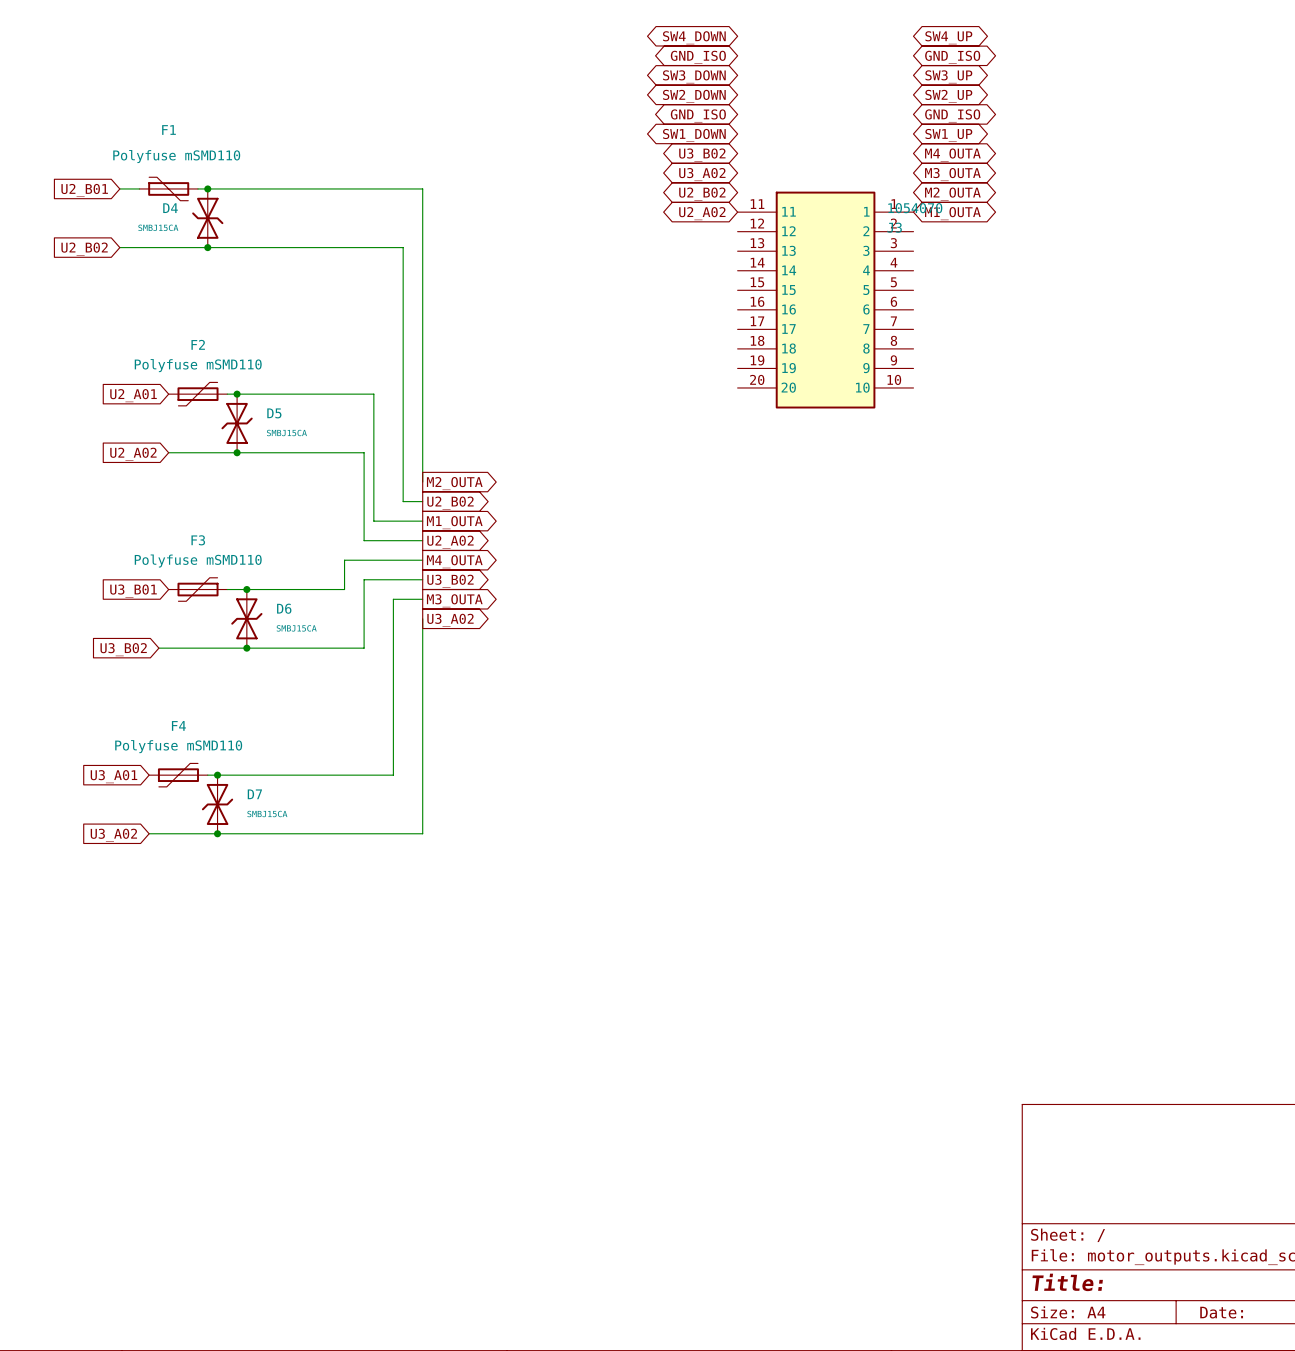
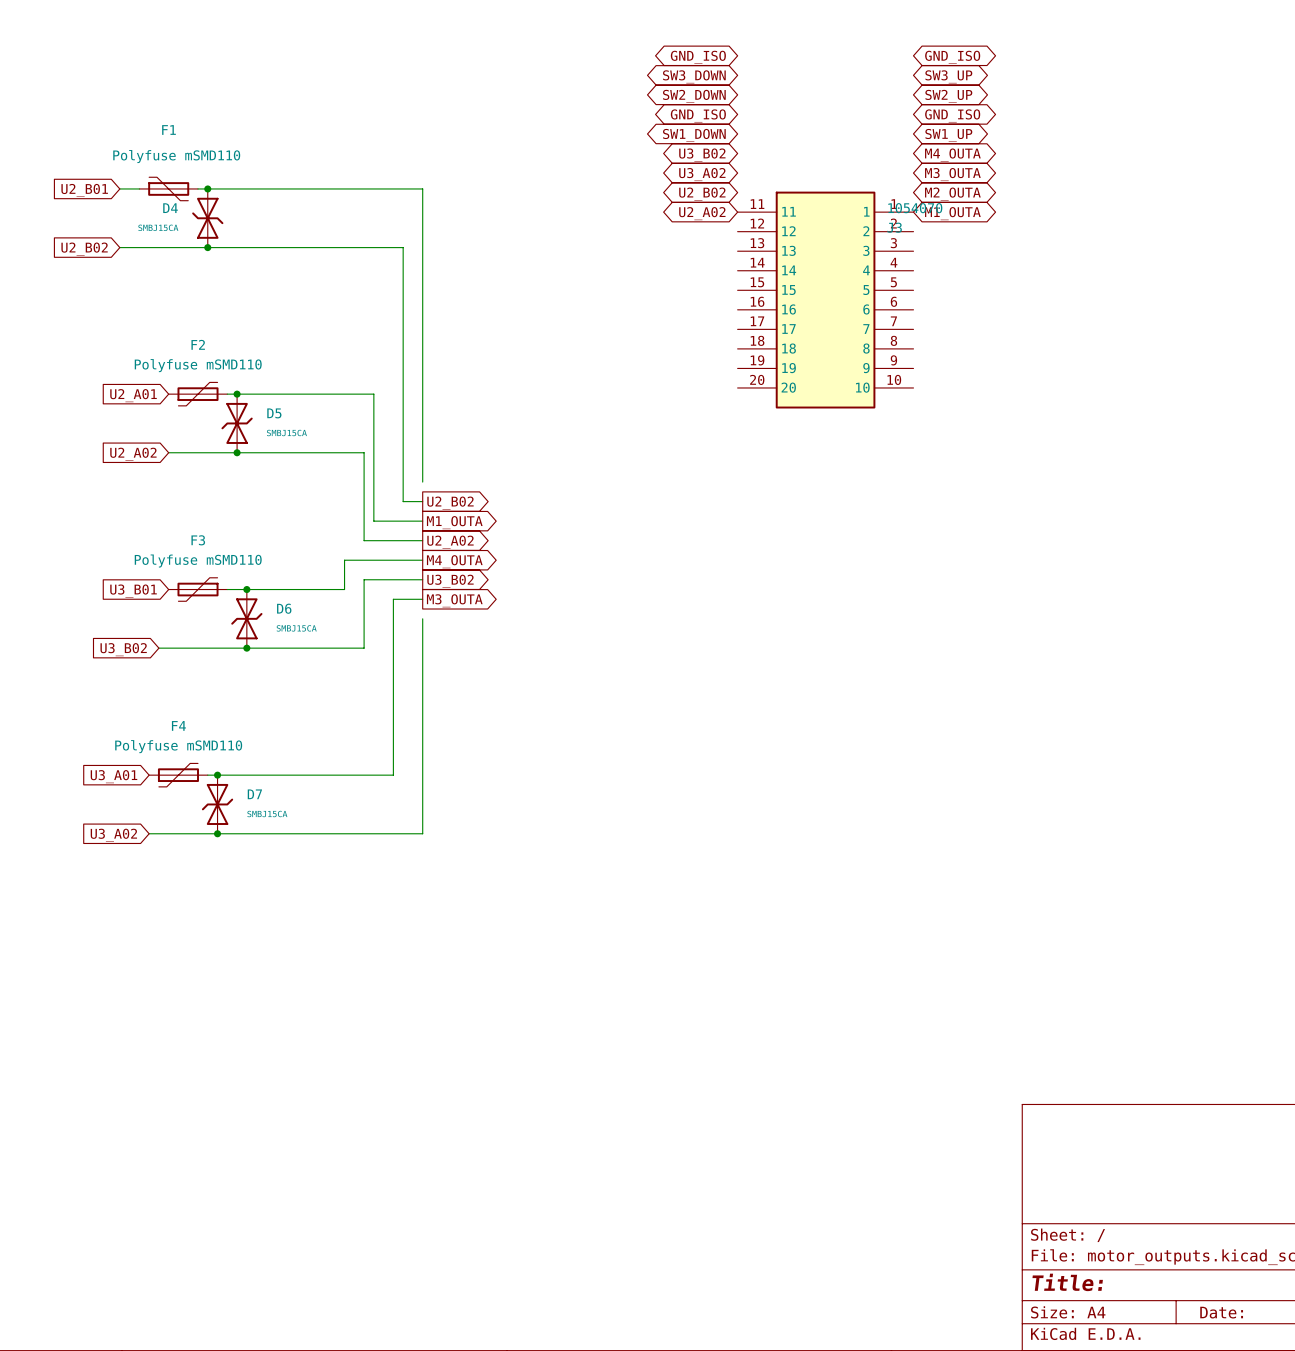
global label: SW4_DOWN (694, 37) -> none
global label: SW4_UP (948, 37) -> none
global label: M2_OUTA (454, 483) -> none
global label: U3_A02 (450, 620) -> none

